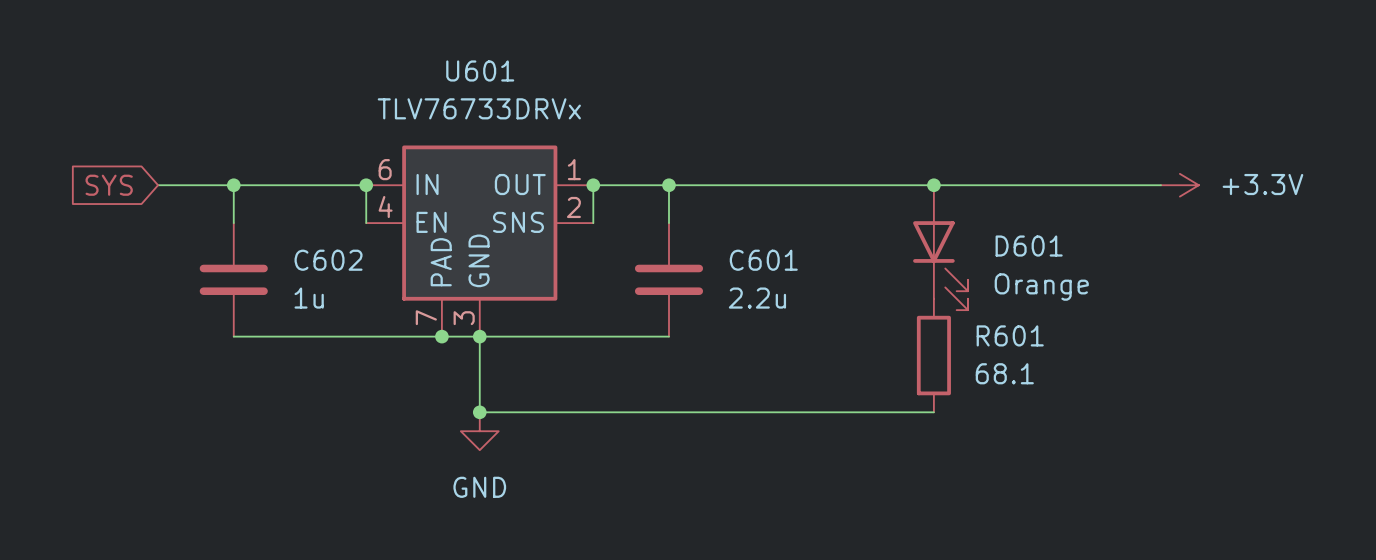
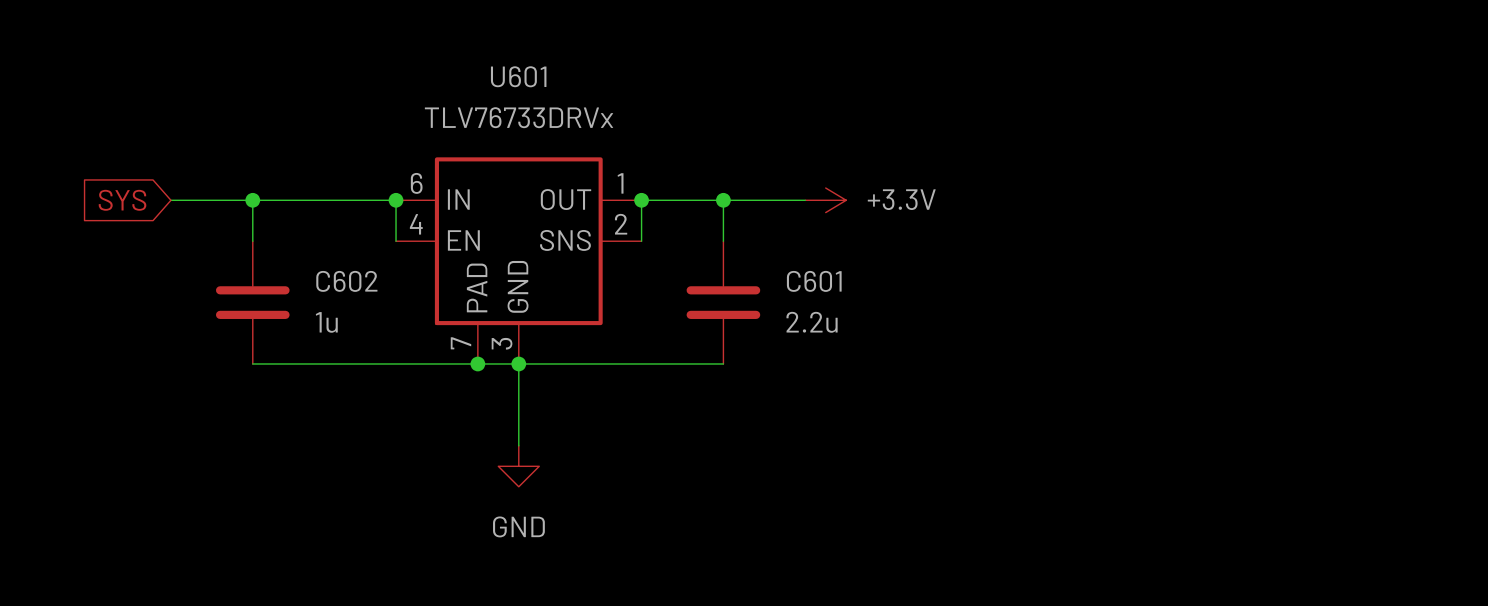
wire: (744, 185) (1160, 185) -> none
power symbol: none -> +3.3V (825, 200)
junction: (933, 185) -> none
power symbol: +3.3V (1179, 185) -> none
D601: Orange (940, 247) -> none
R601: 68.1 (933, 355) -> none
wire: (479, 412) (933, 412) -> none
junction: (479, 412) -> none

